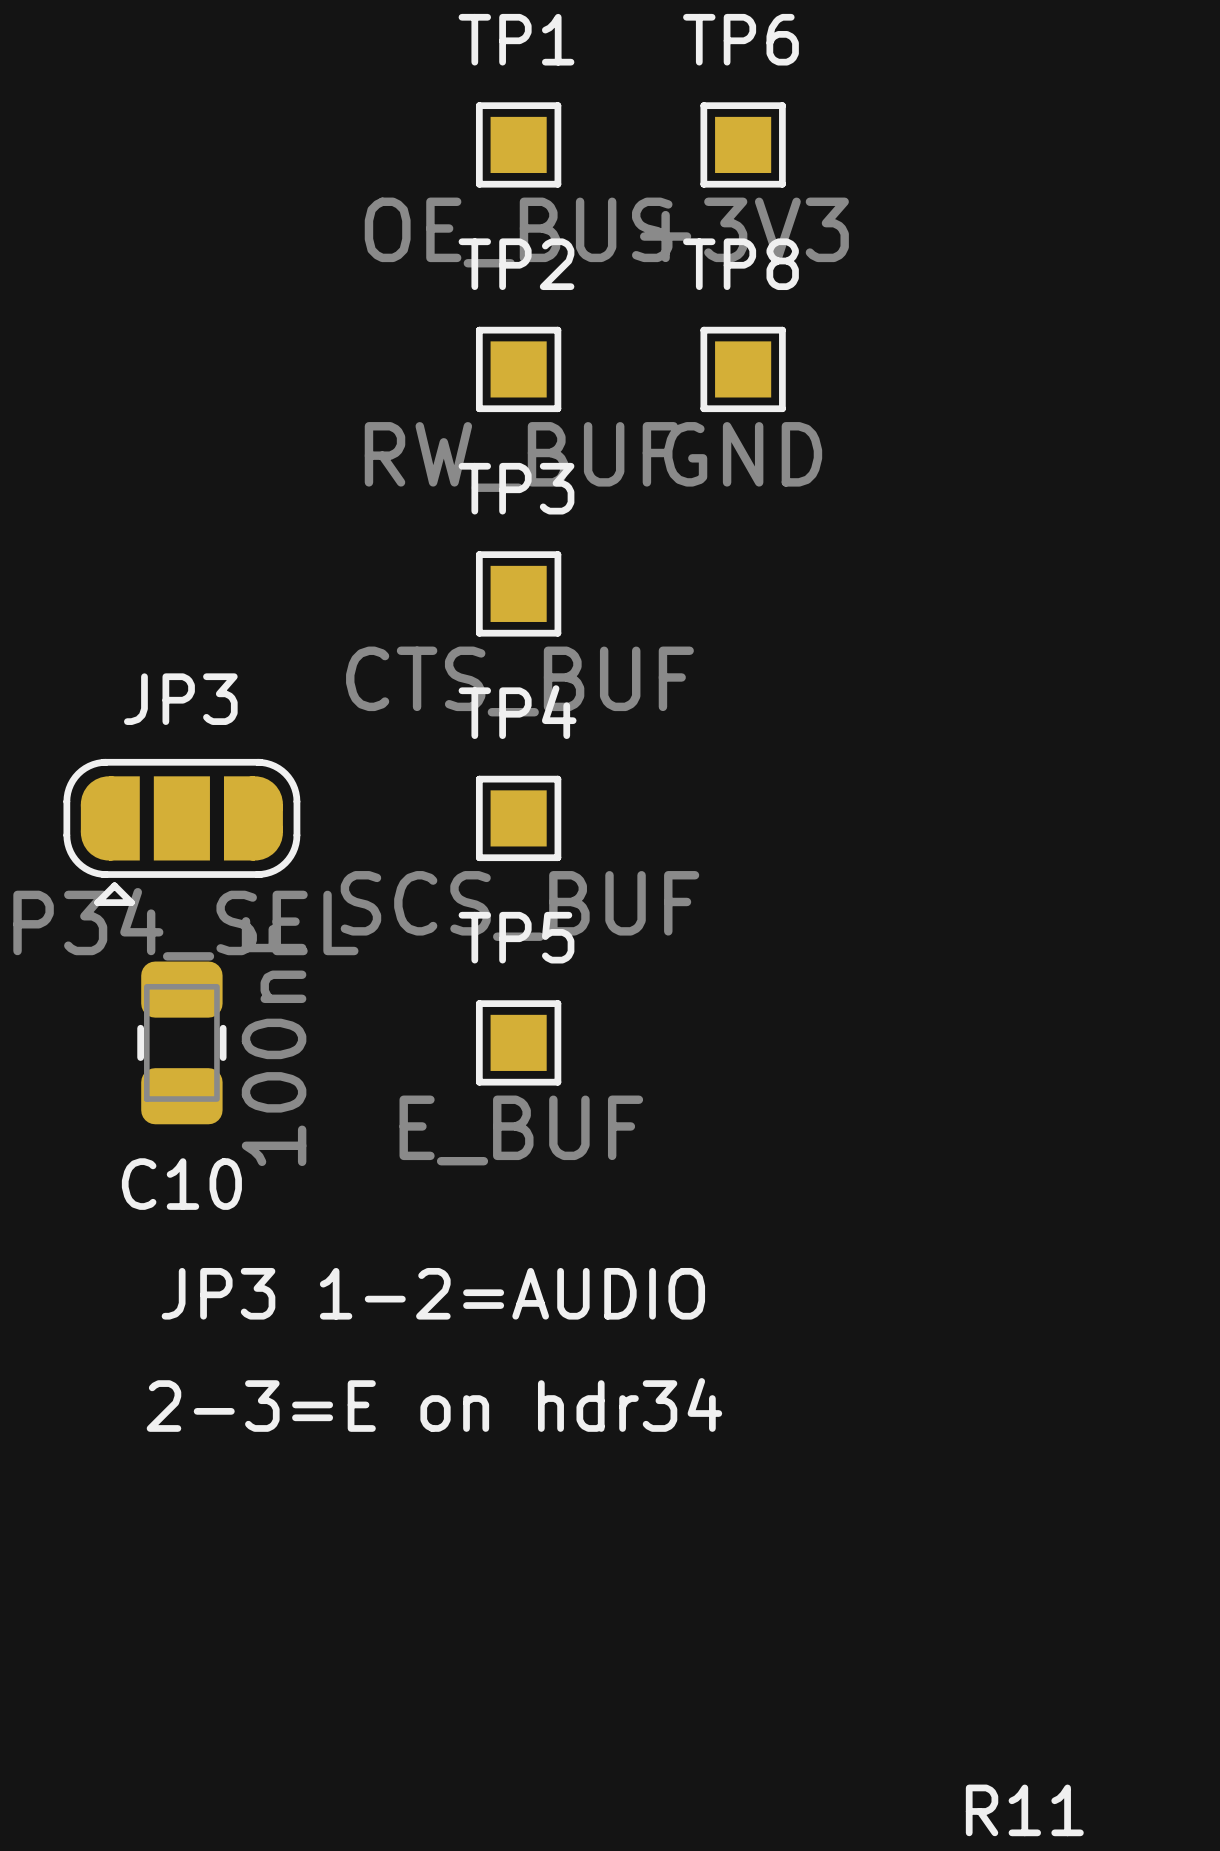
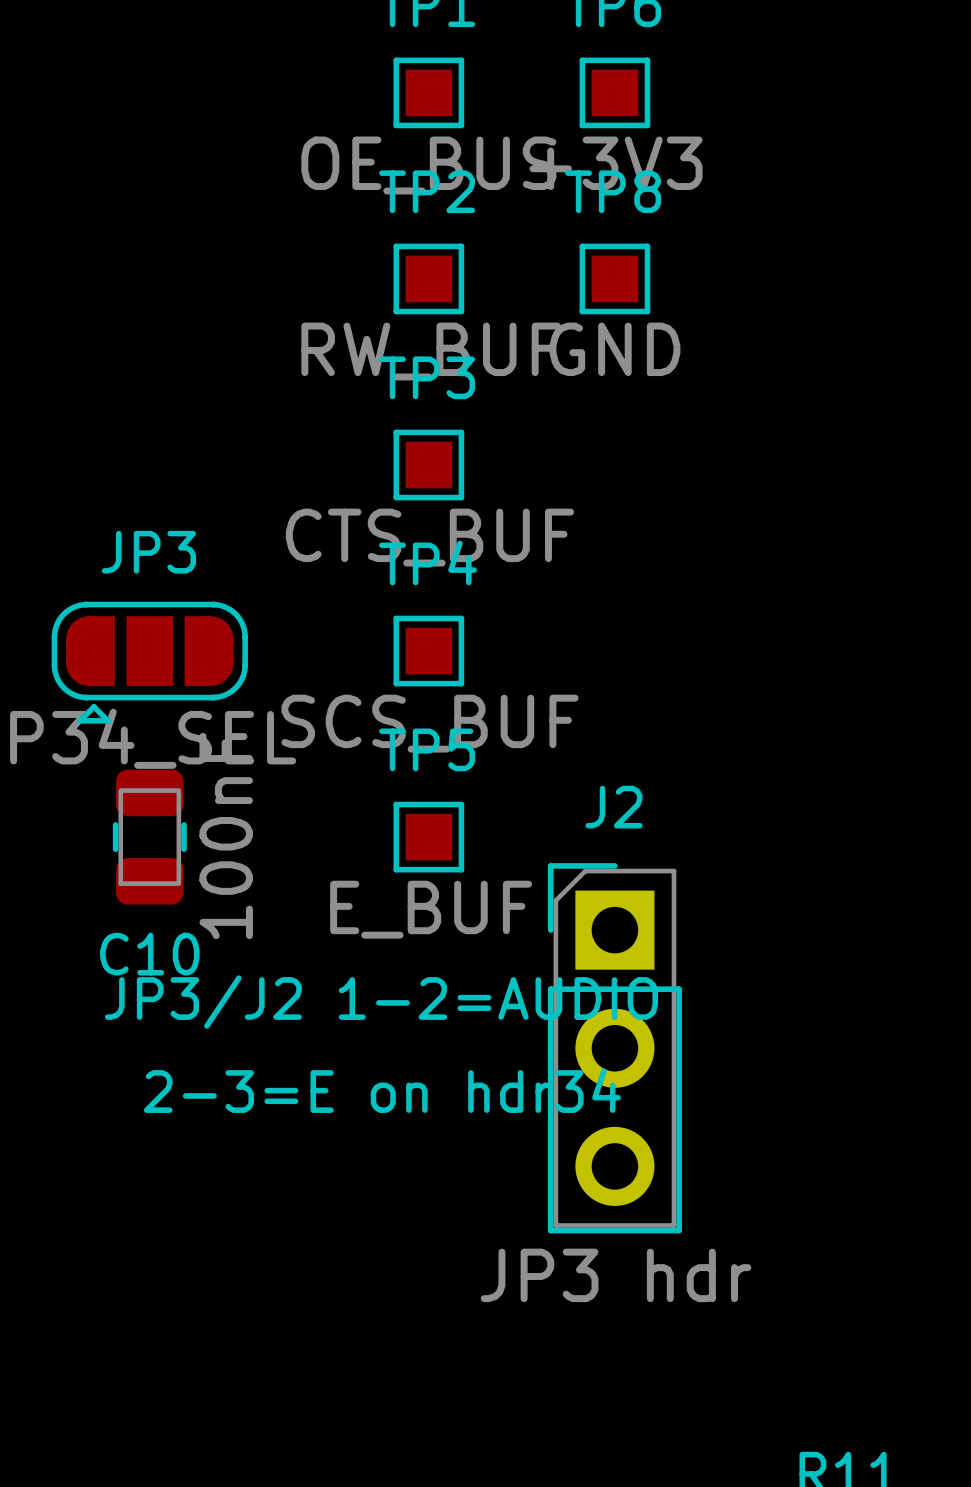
text: JP3 1-2=AUDIO (433, 1293) -> JP3/J2 1-2=AUDIO (381, 1002)
J2: none -> JP3 hdr (614, 1048)
text position: 2-3=E on hdr34 (434, 1404) -> 2-3=E on hdr34 (382, 1090)

